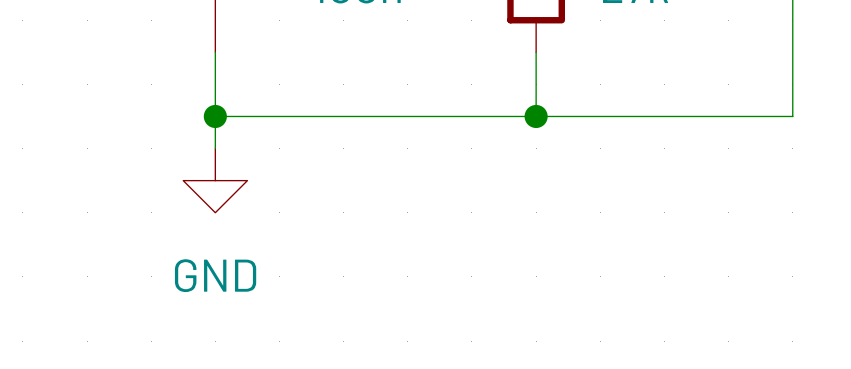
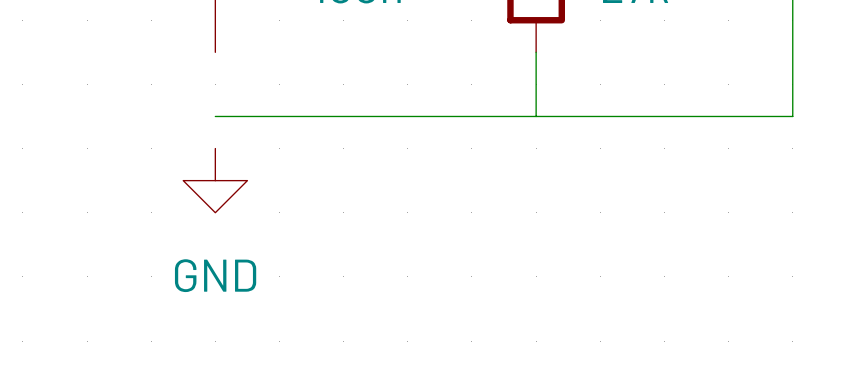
wire: (215, 52) (215, 148) -> none
junction: (215, 116) -> none
junction: (536, 116) -> none

